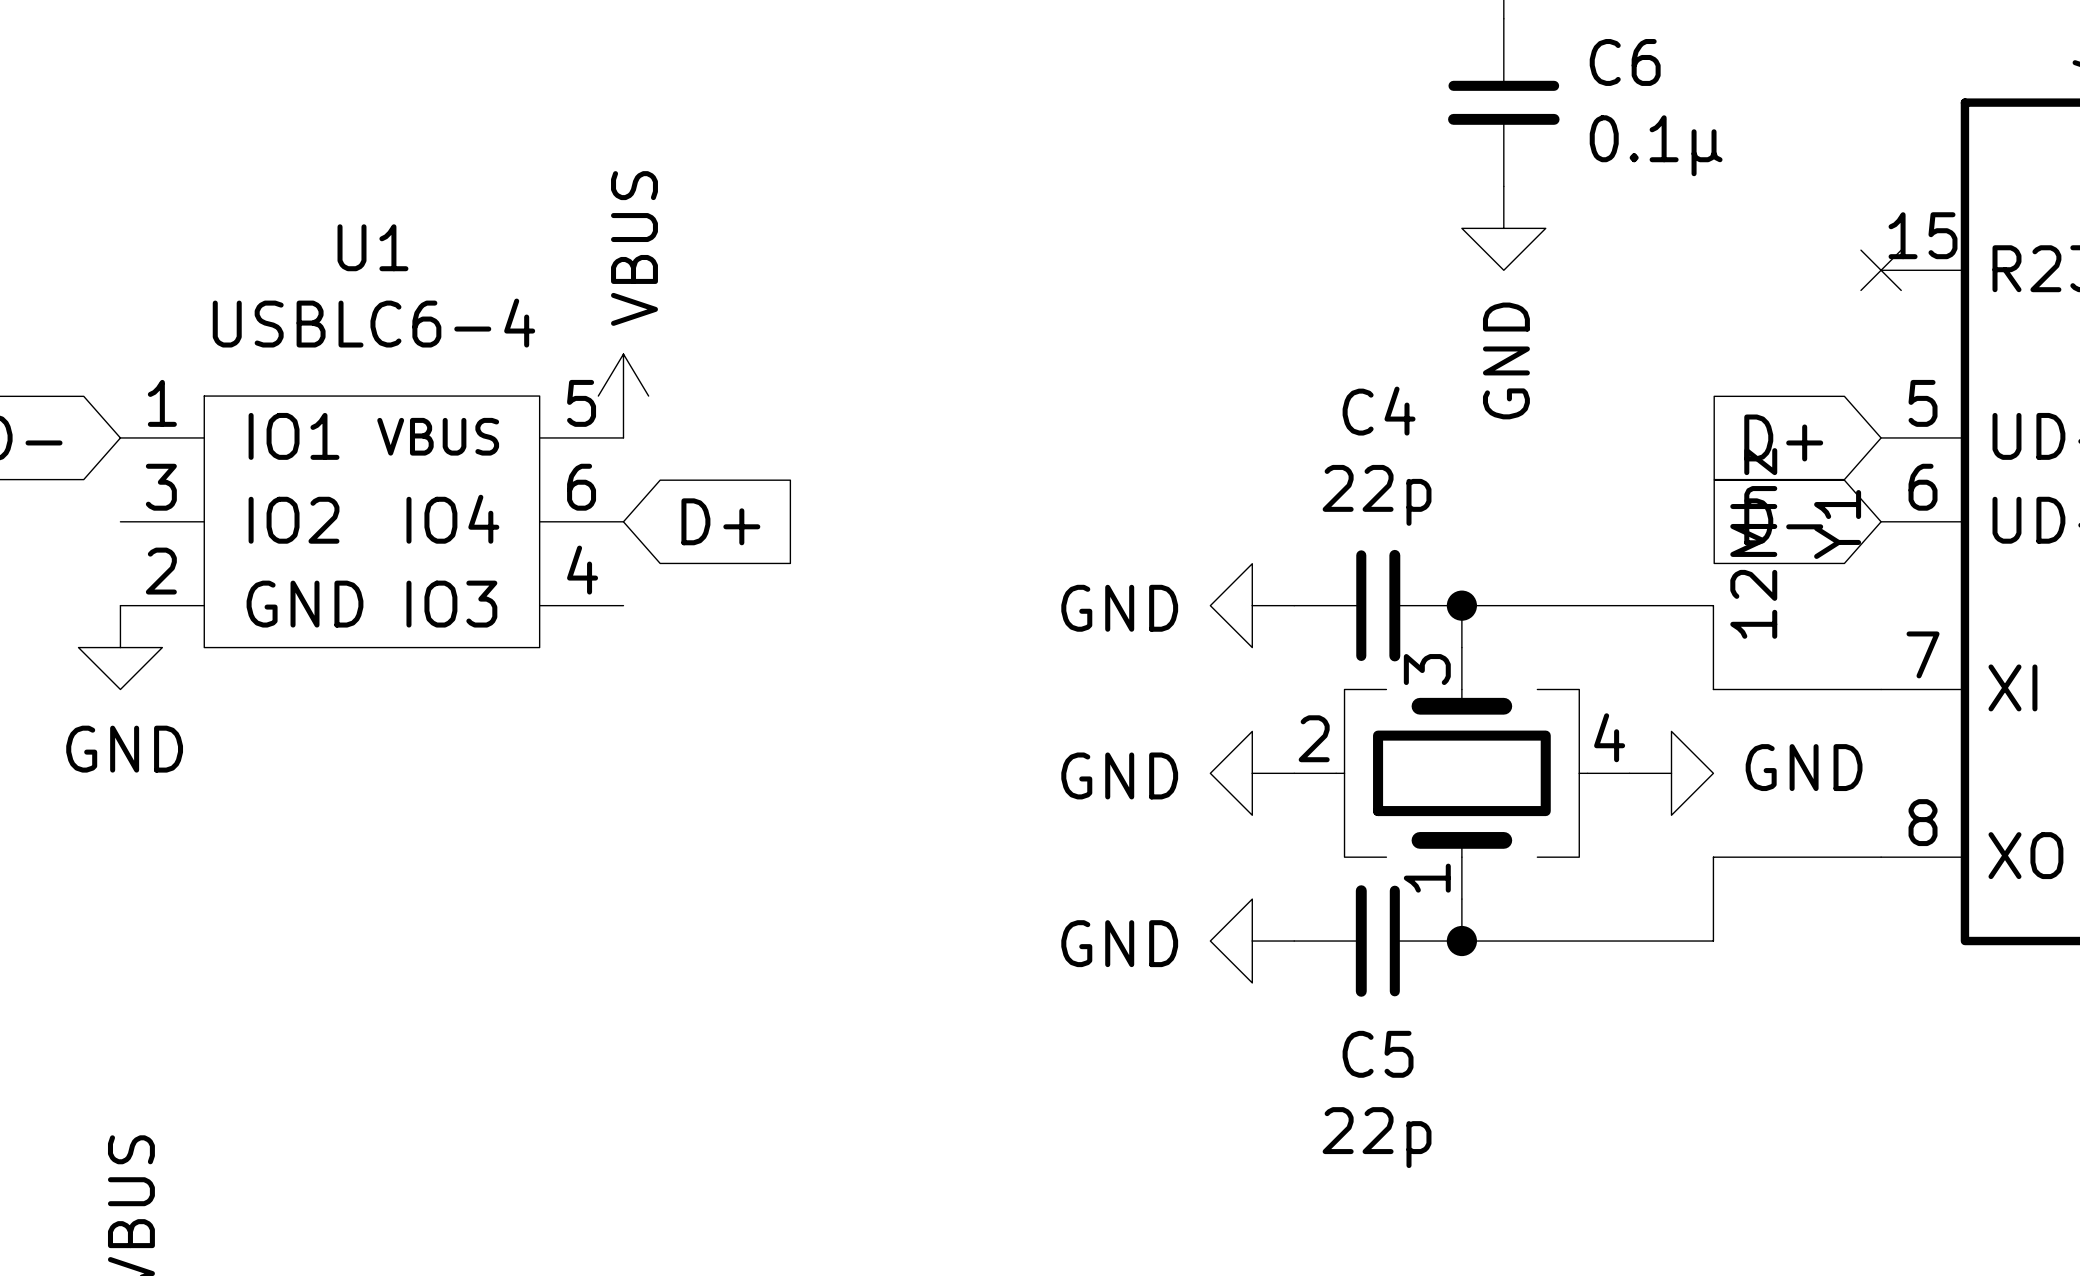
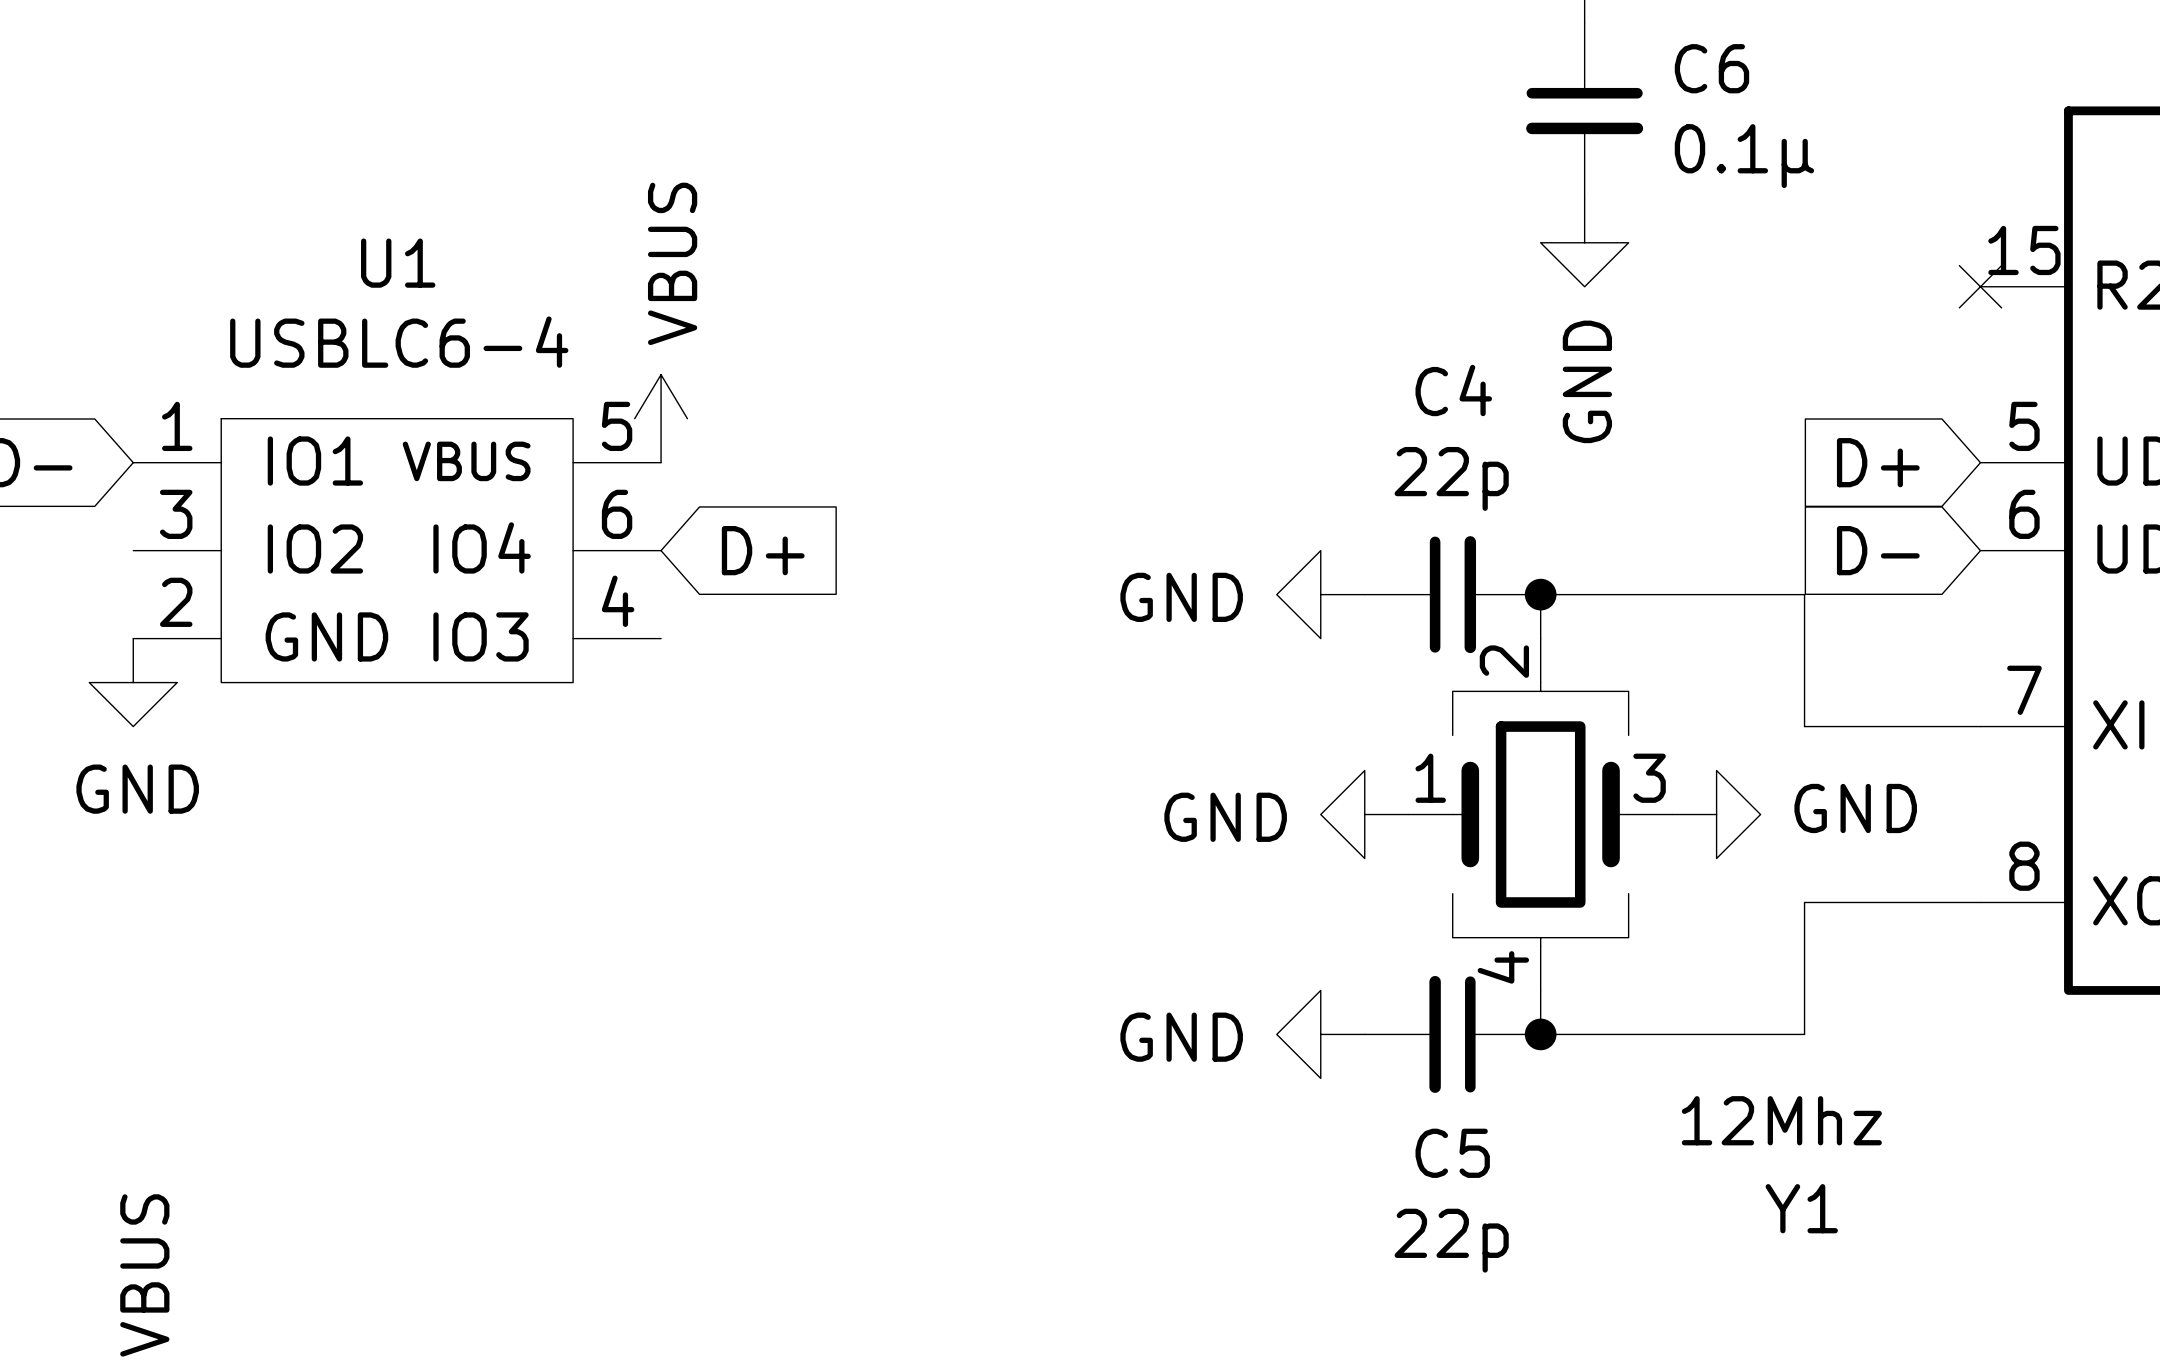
power symbol position: GND (1252, 605) -> GND (1320, 594)
C4 position: (1378, 605) -> (1452, 594)
junction position: (1461, 605) -> (1540, 594)
wire: (1713, 605) (1461, 605) (1461, 647) -> (1804, 638) (1804, 594) (1540, 594) (1540, 638)
power symbol position: GND (1252, 773) -> GND (1364, 814)
Y1 rotation: 0° (1461, 773) -> 90° clockwise (1540, 814)
power symbol position: GND (1671, 773) -> GND (1716, 814)
wire: (1461, 899) (1461, 941) (1713, 941) -> (1540, 990) (1540, 1034) (1804, 1034) (1804, 990)
power symbol position: GND (1252, 941) -> GND (1320, 1034)
C5 position: (1378, 941) -> (1452, 1034)
junction position: (1461, 941) -> (1540, 1034)

